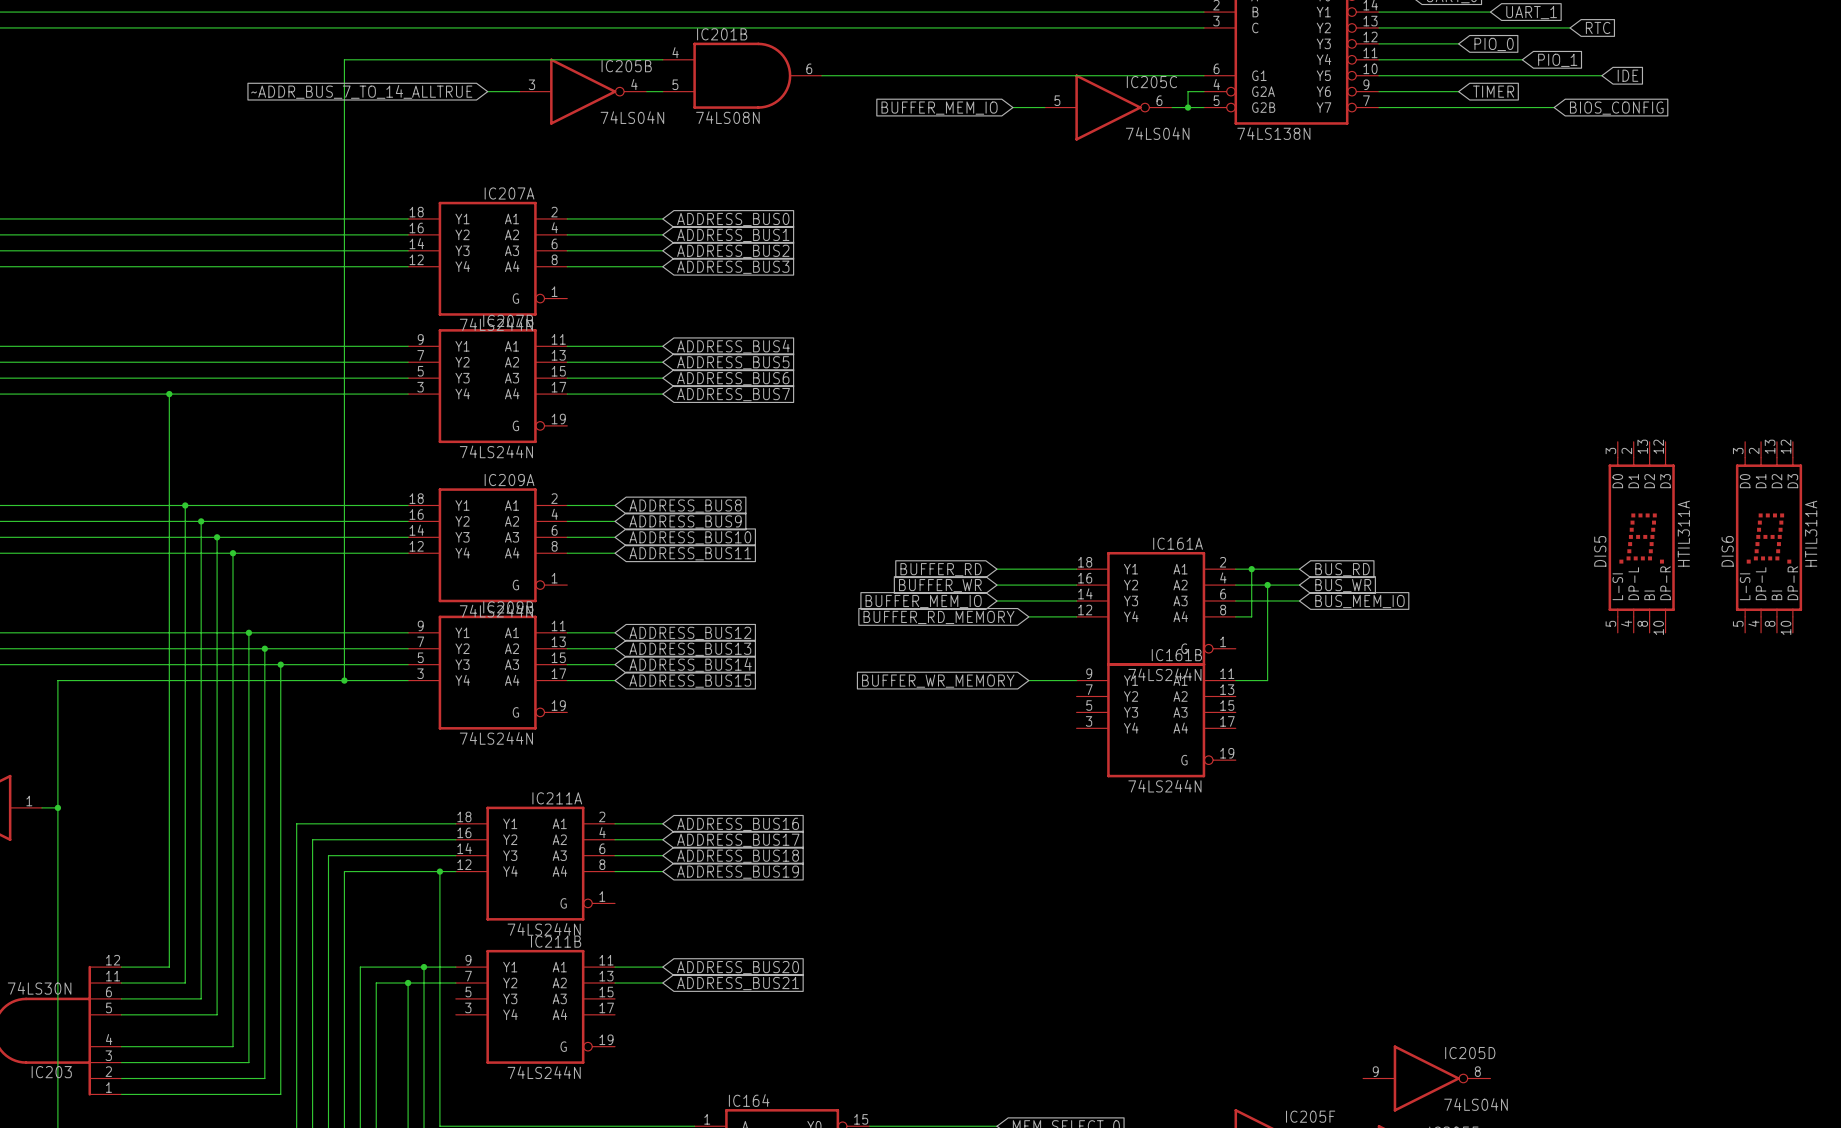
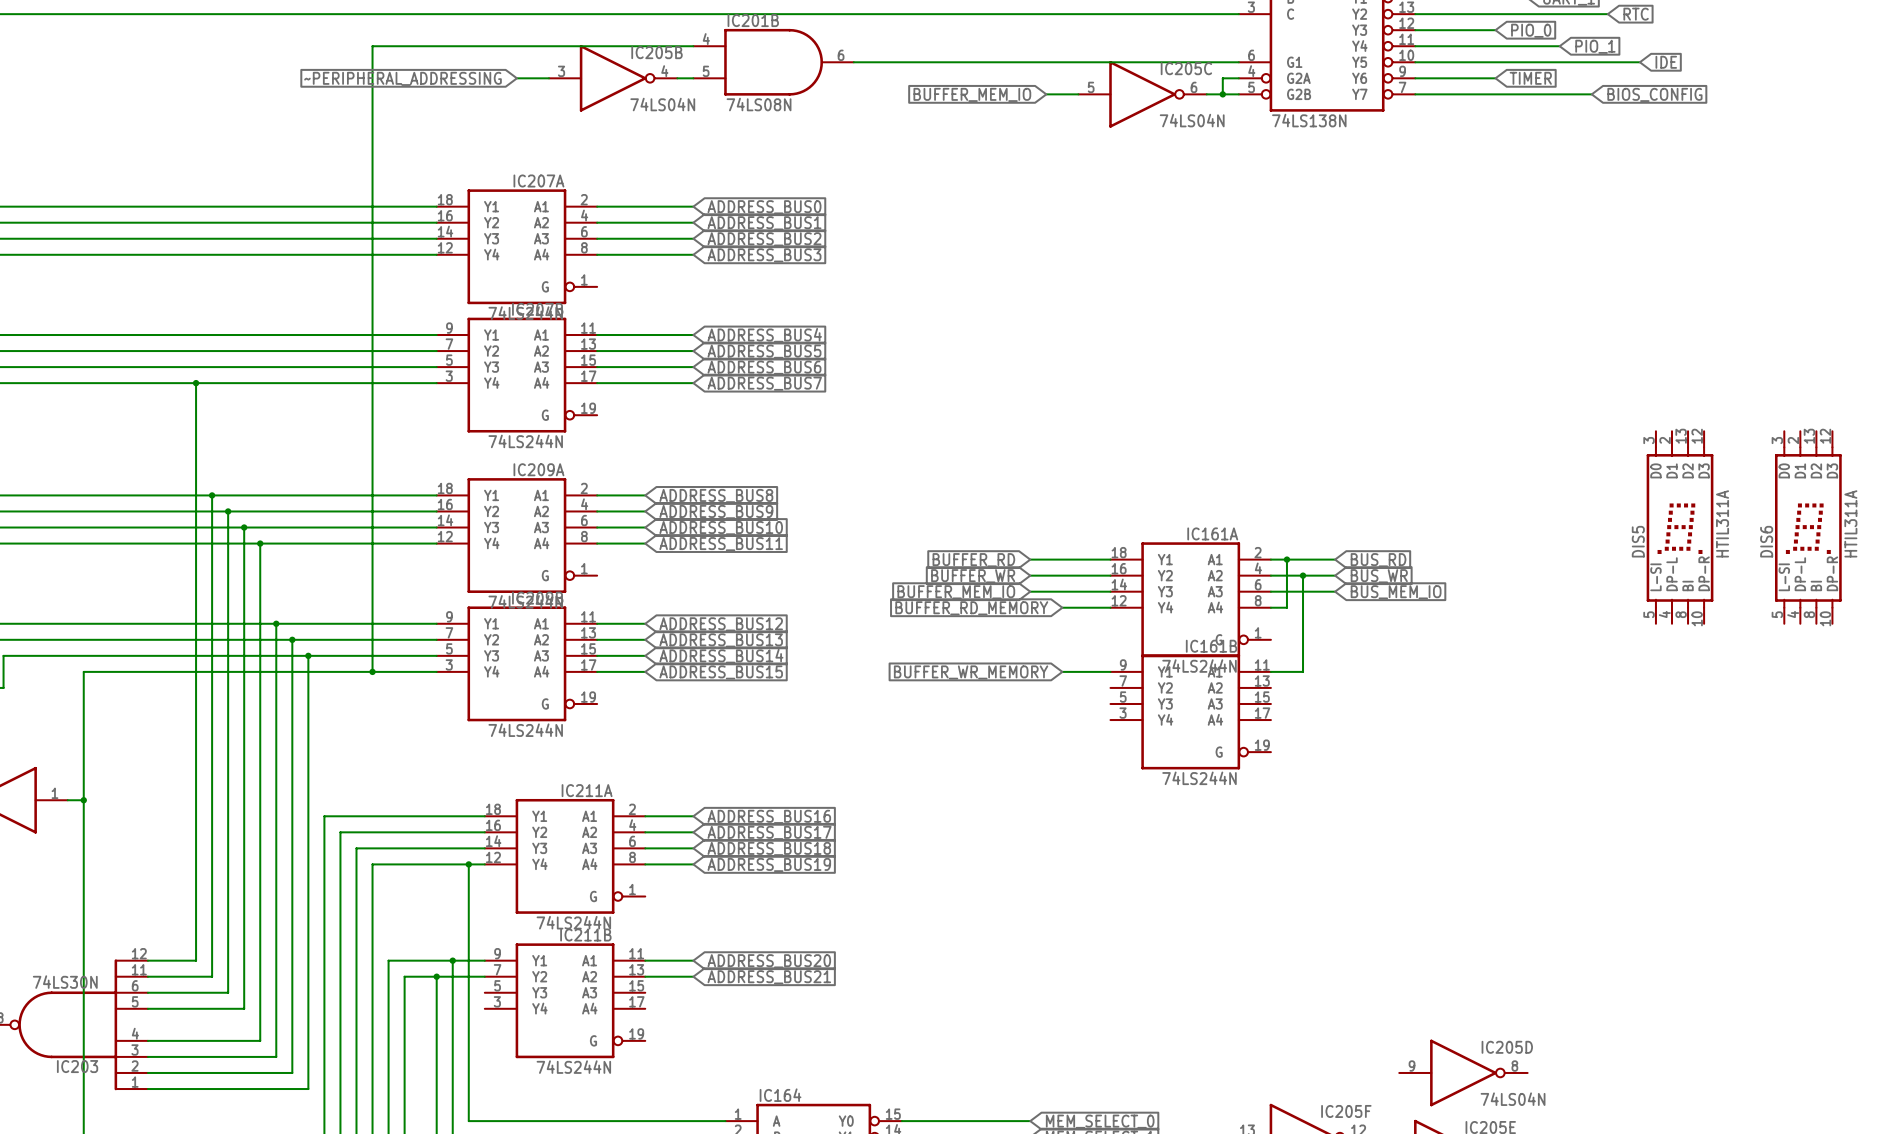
global label: ~ADDR_BUS_7_TO_14_ALLTRUE (361, 91) -> ~PERIPHERAL_ADDRESSING (402, 78)

